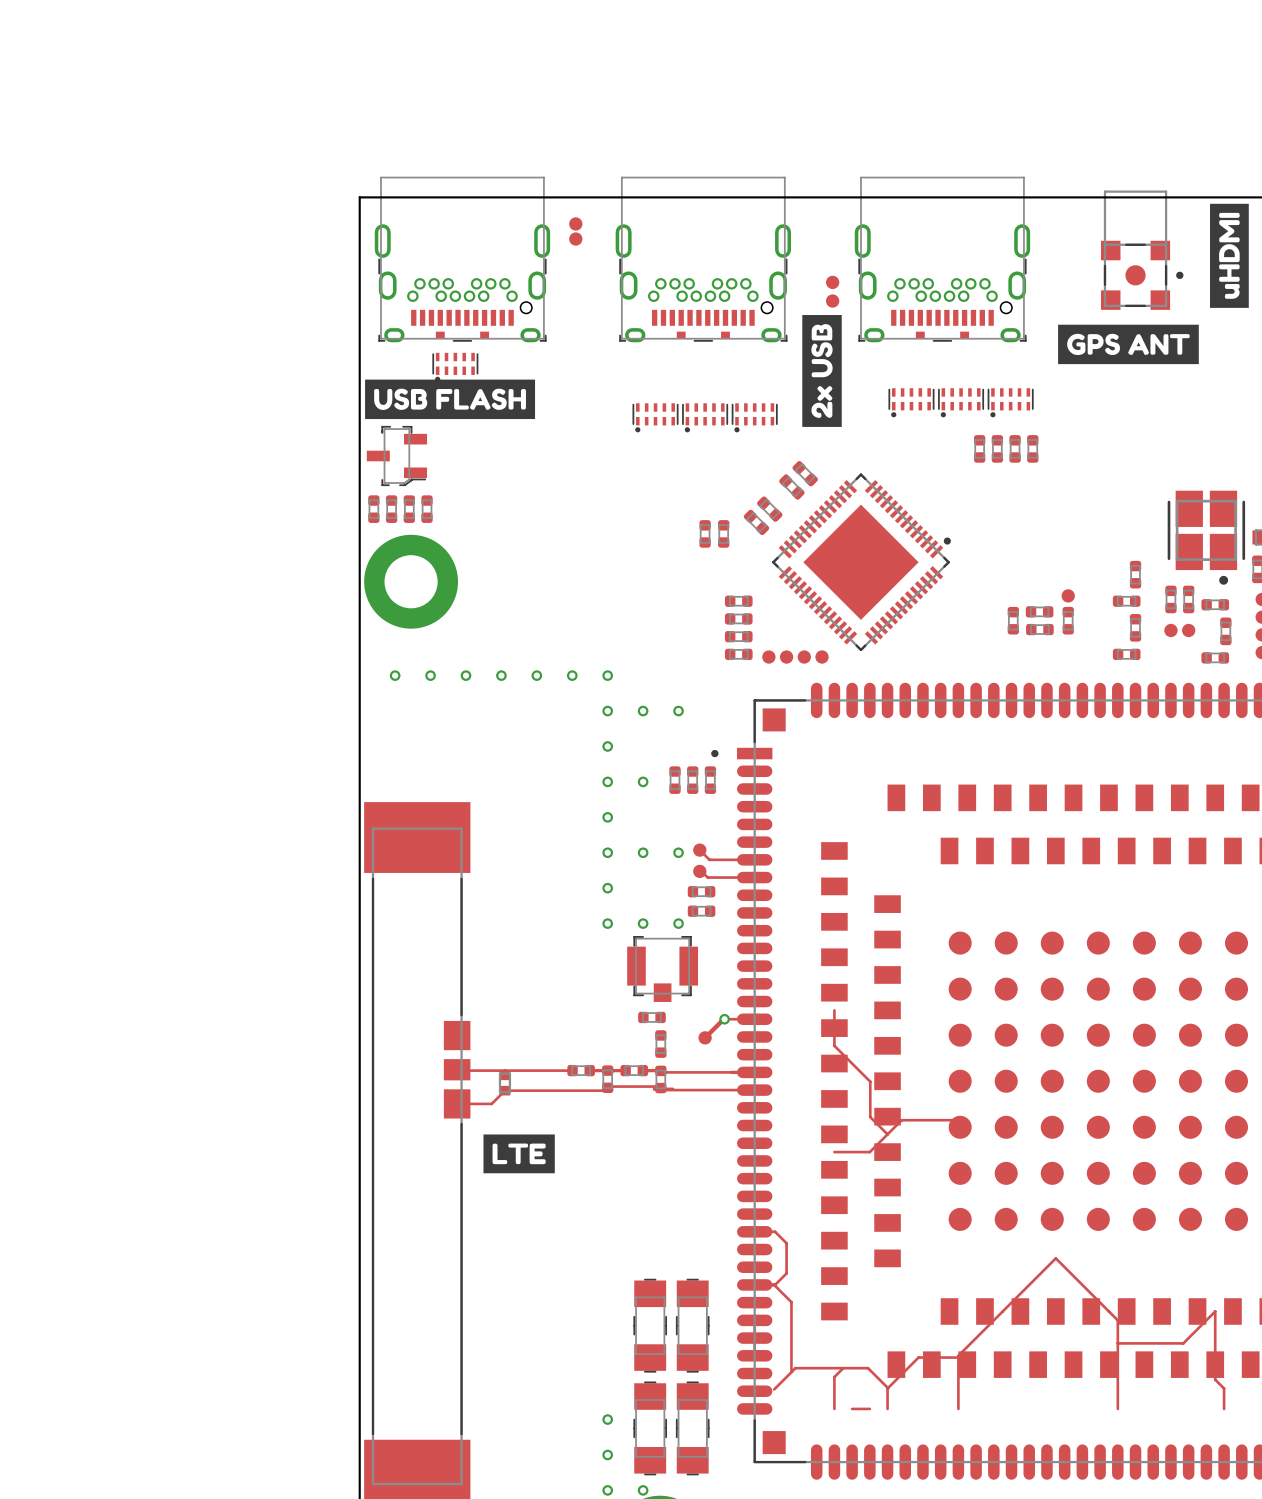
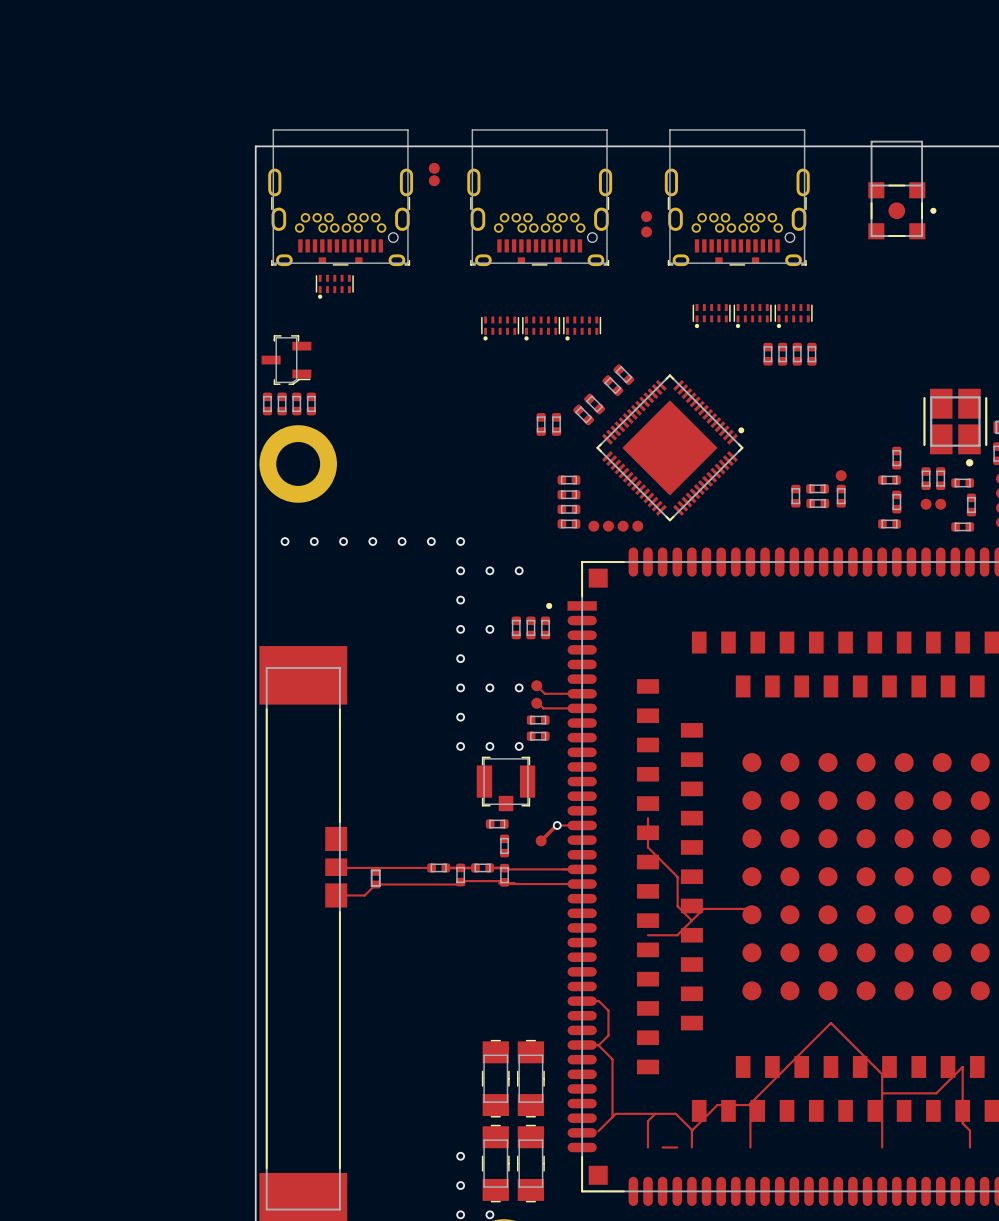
drawing: [1058, 203, 1249, 365] -> none
drawing: [802, 315, 842, 427] -> none
drawing: [365, 379, 536, 420] -> none
drawing: [483, 1134, 555, 1174] -> none

